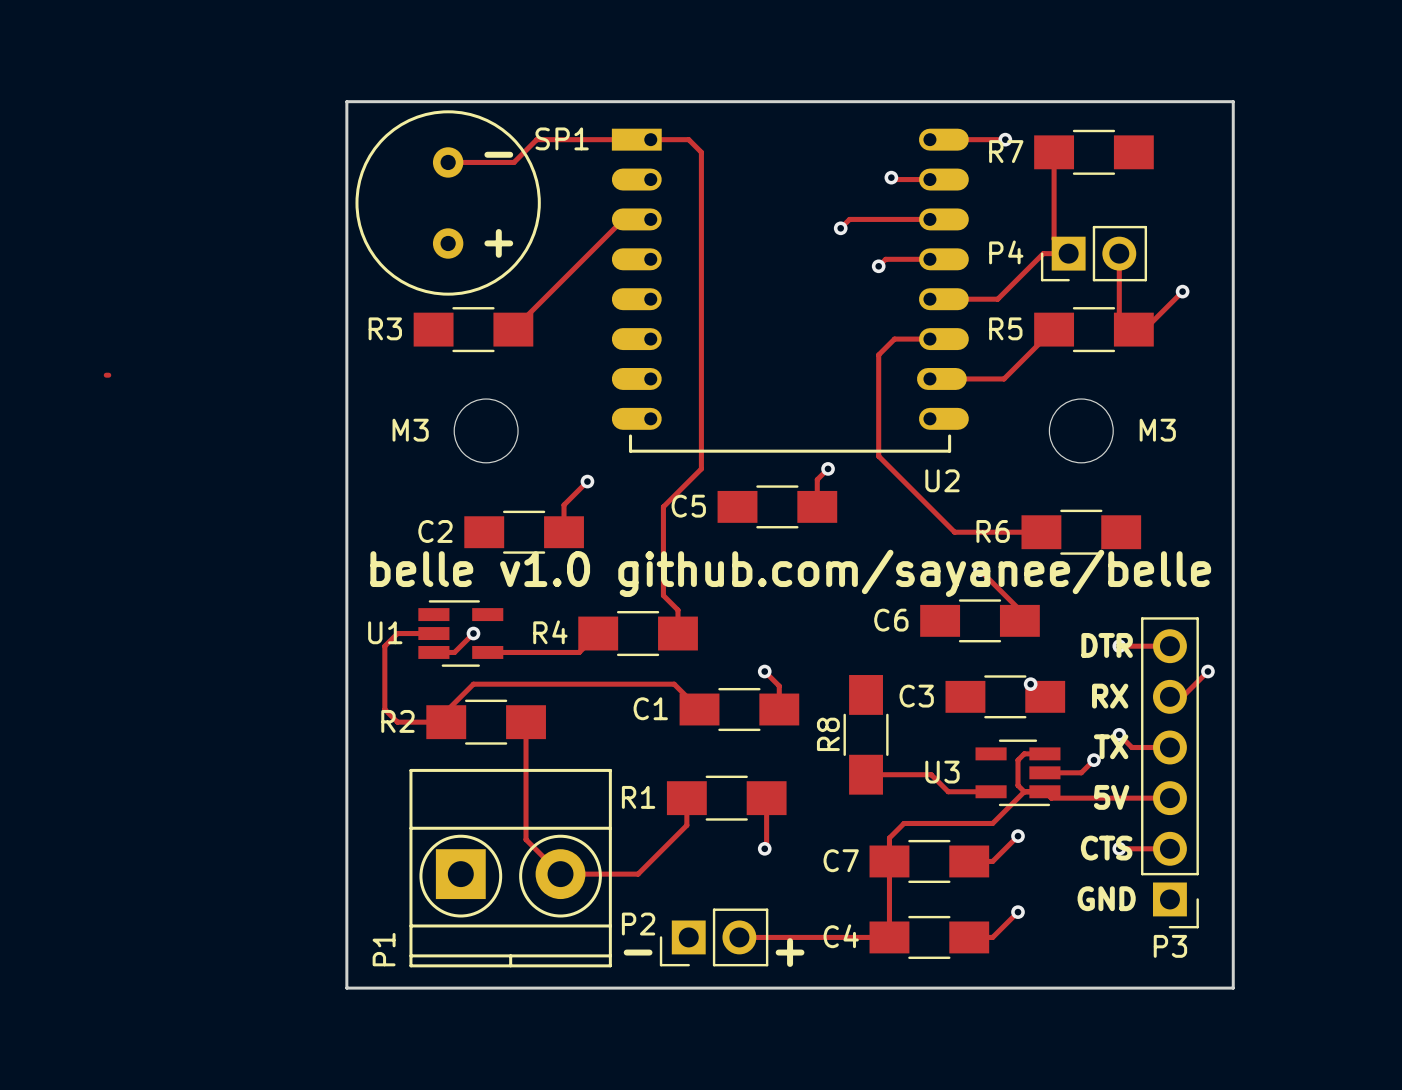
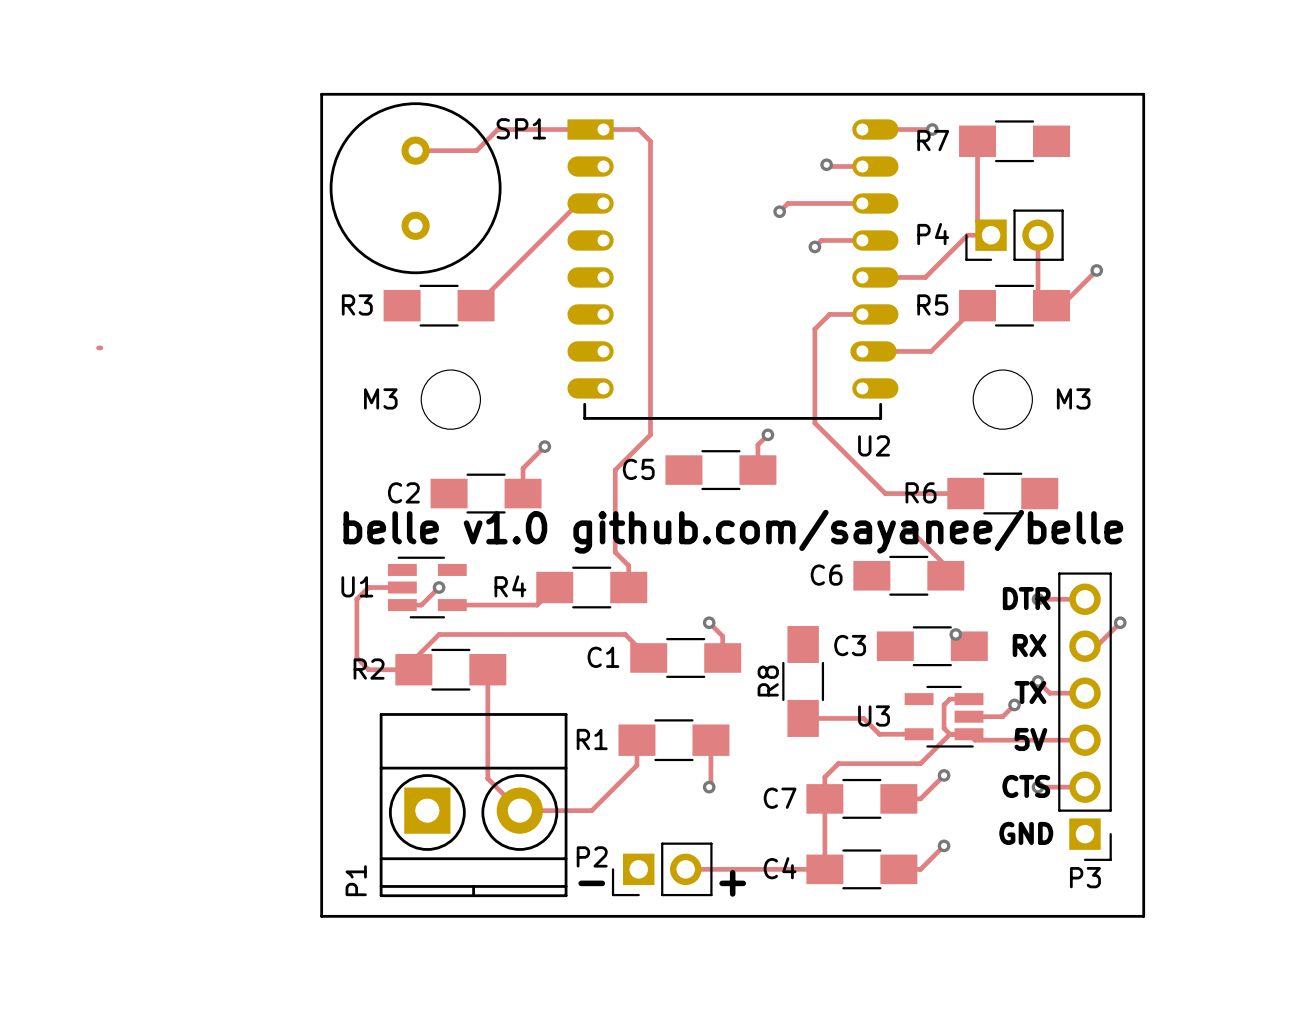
text: - (498, 154) -> none
text: + (498, 243) -> none

